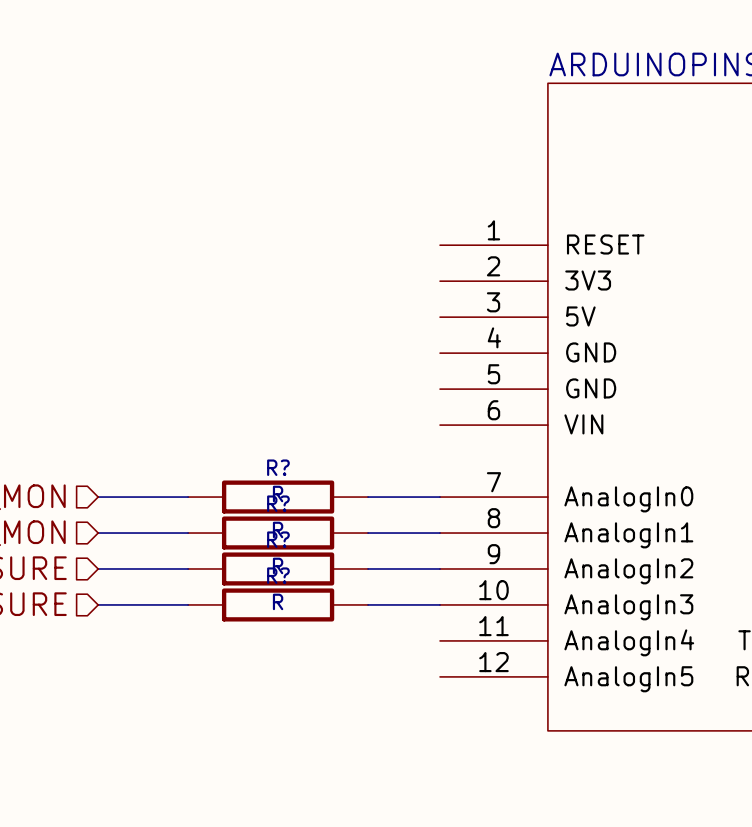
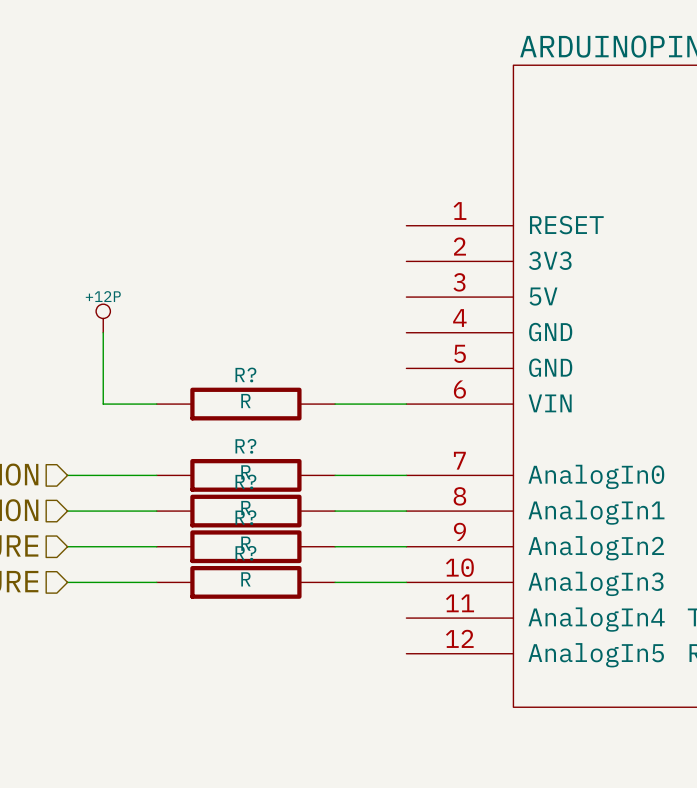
power symbol: none -> +12P (103, 318)
wire: none -> (103, 332) (103, 404) (156, 404)
R?: none -> R (245, 404)
wire: none -> (335, 404) (406, 404)

